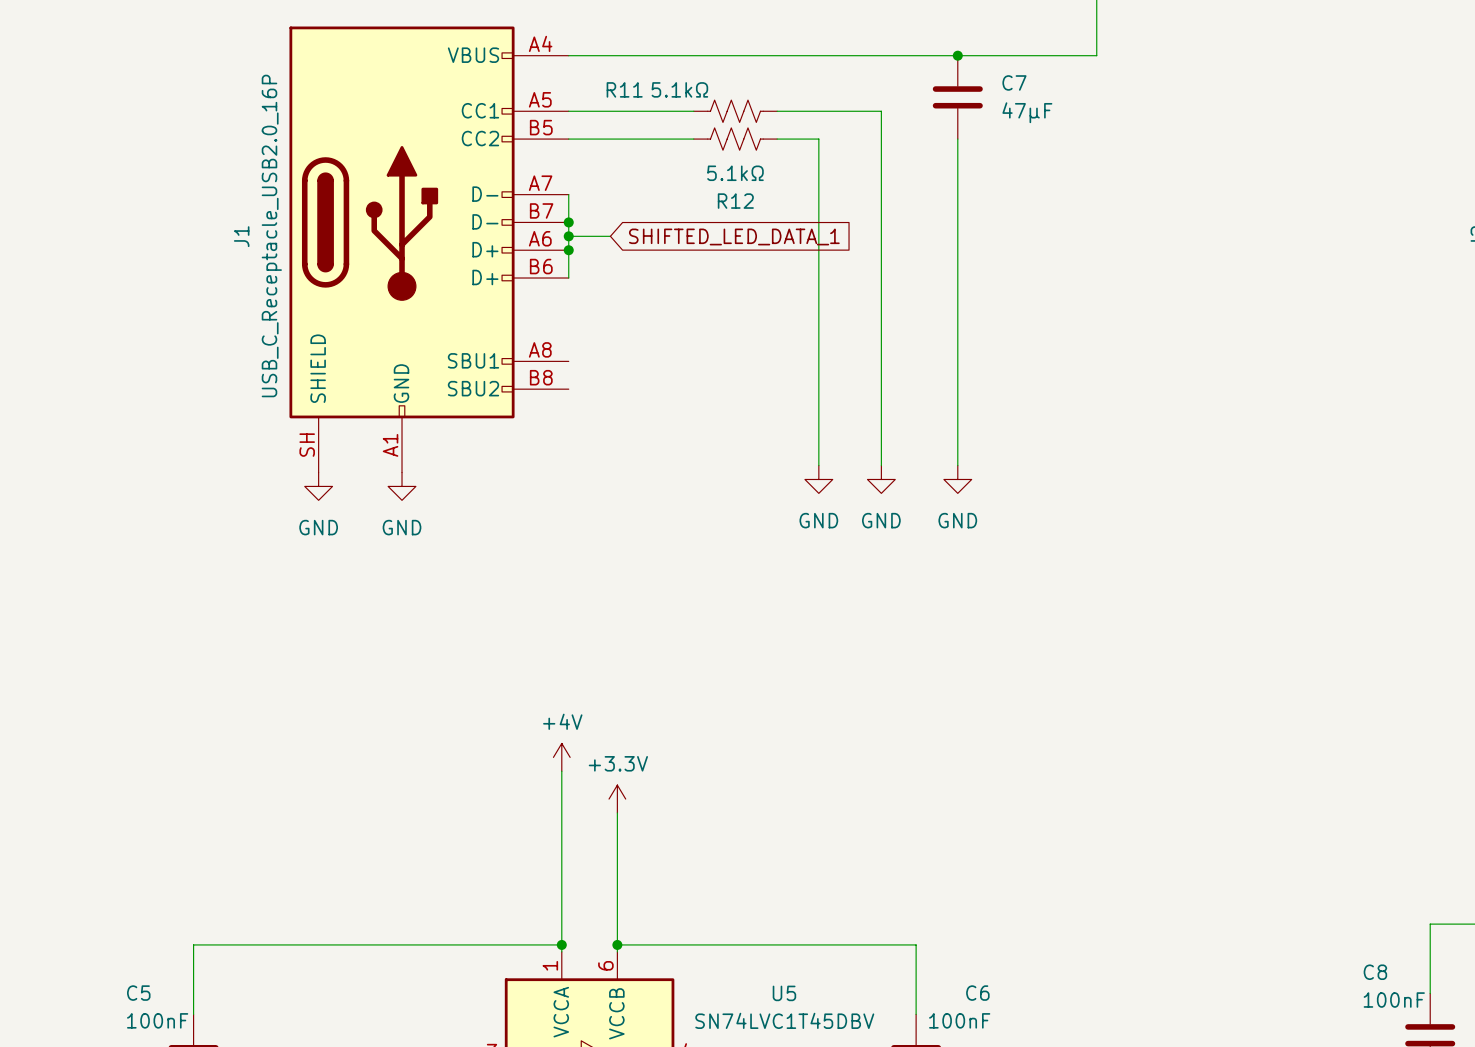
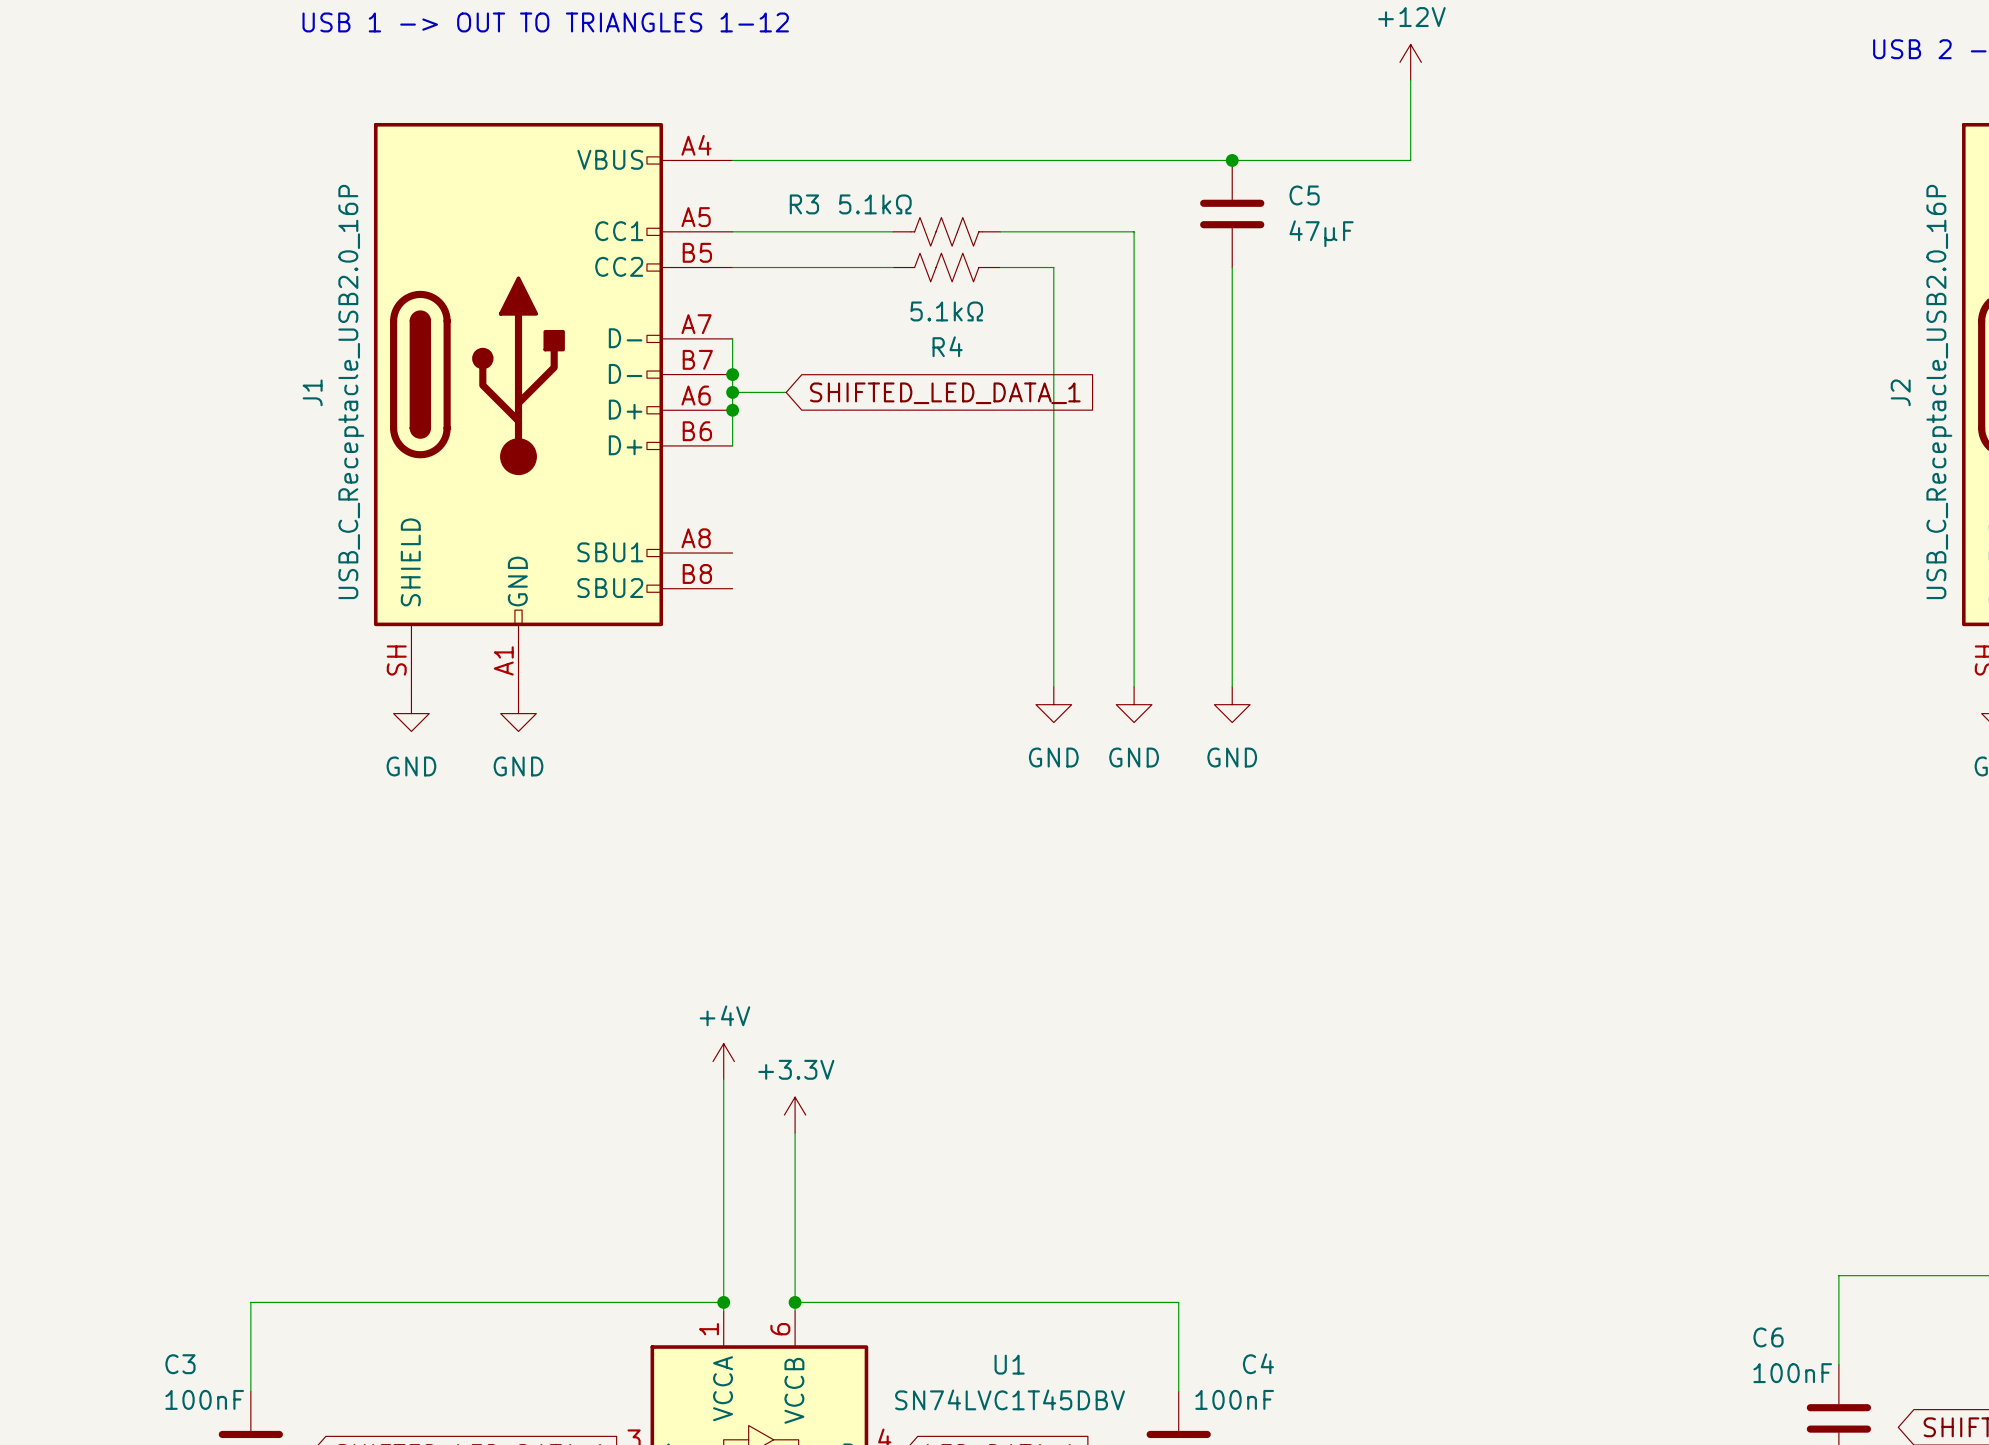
C7 name: C7 (1014, 82) -> C5 (1304, 195)
R11 name: R11 (624, 89) -> R3 (804, 204)
R12 name: R12 (735, 201) -> R4 (947, 346)
C8 name: C8 (1375, 972) -> C6 (1768, 1337)
C5 name: C5 (138, 993) -> C3 (180, 1364)
U5 name: U5 (784, 993) -> U1 (1009, 1364)
C6 name: C6 (977, 993) -> C4 (1258, 1363)

